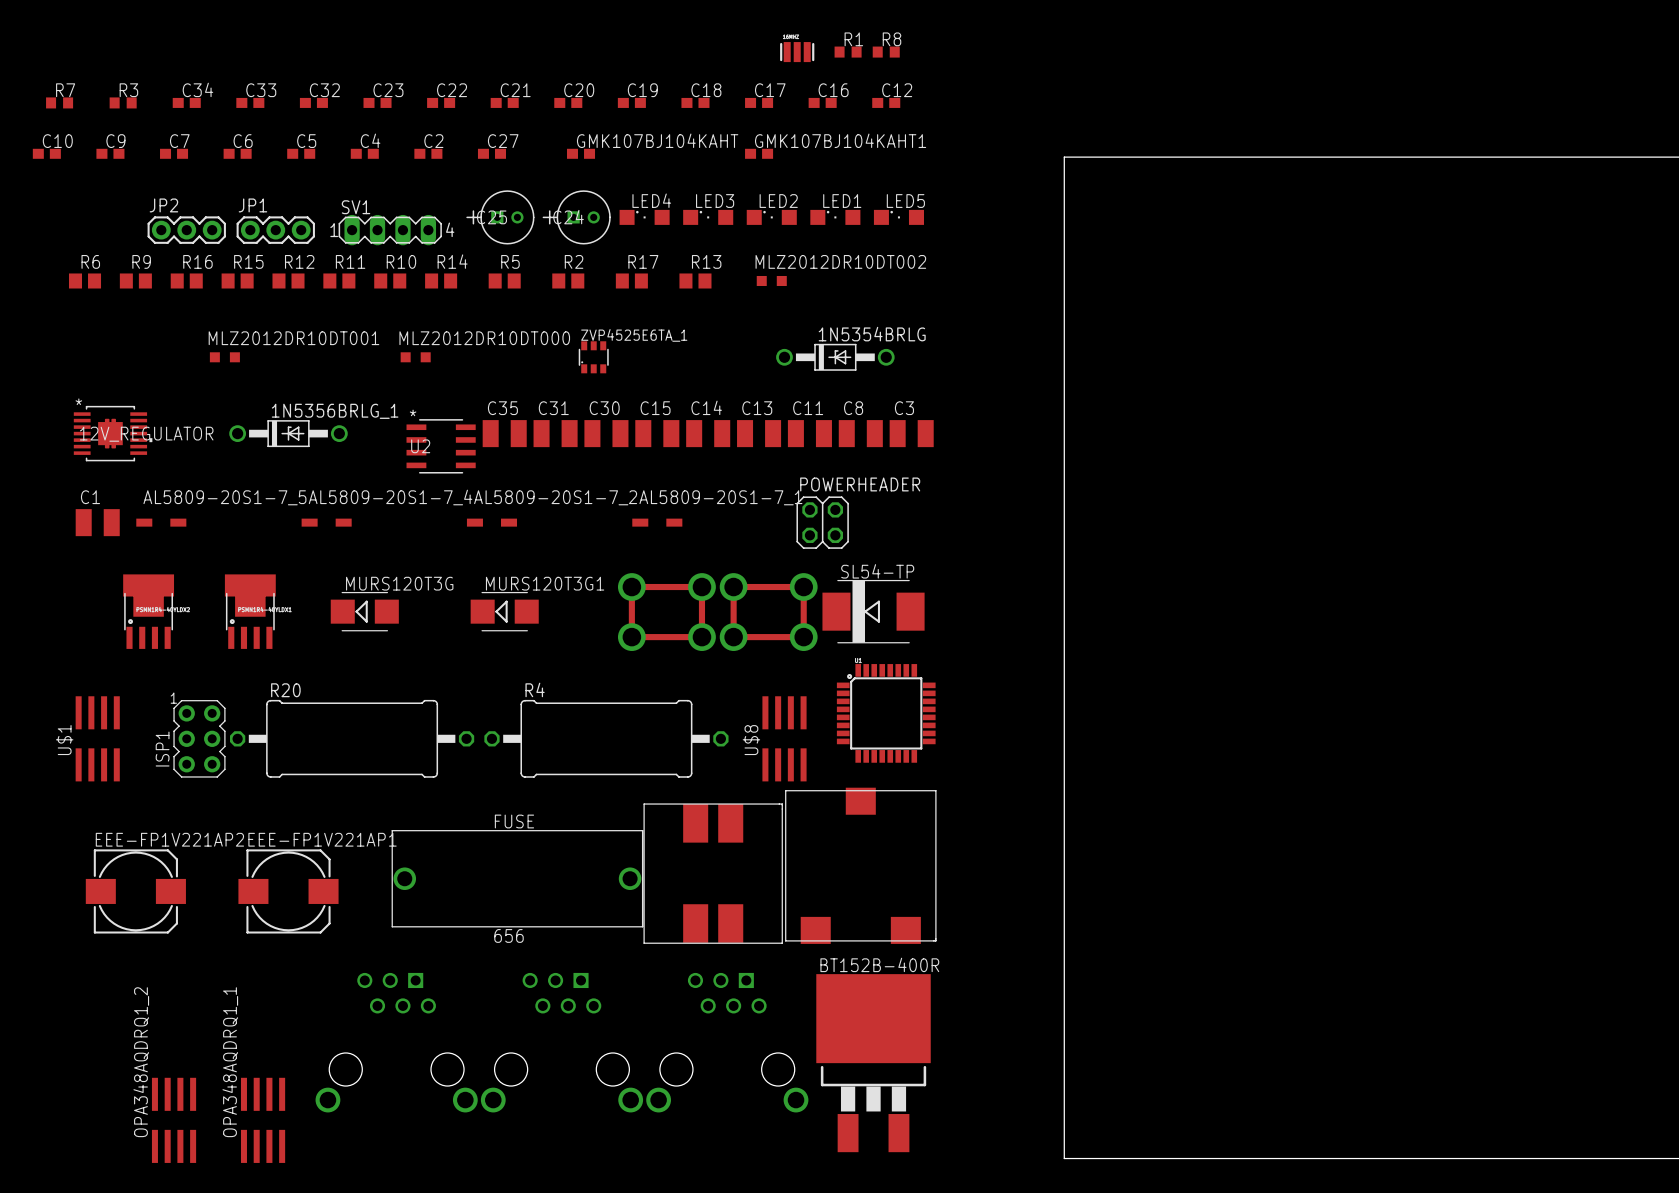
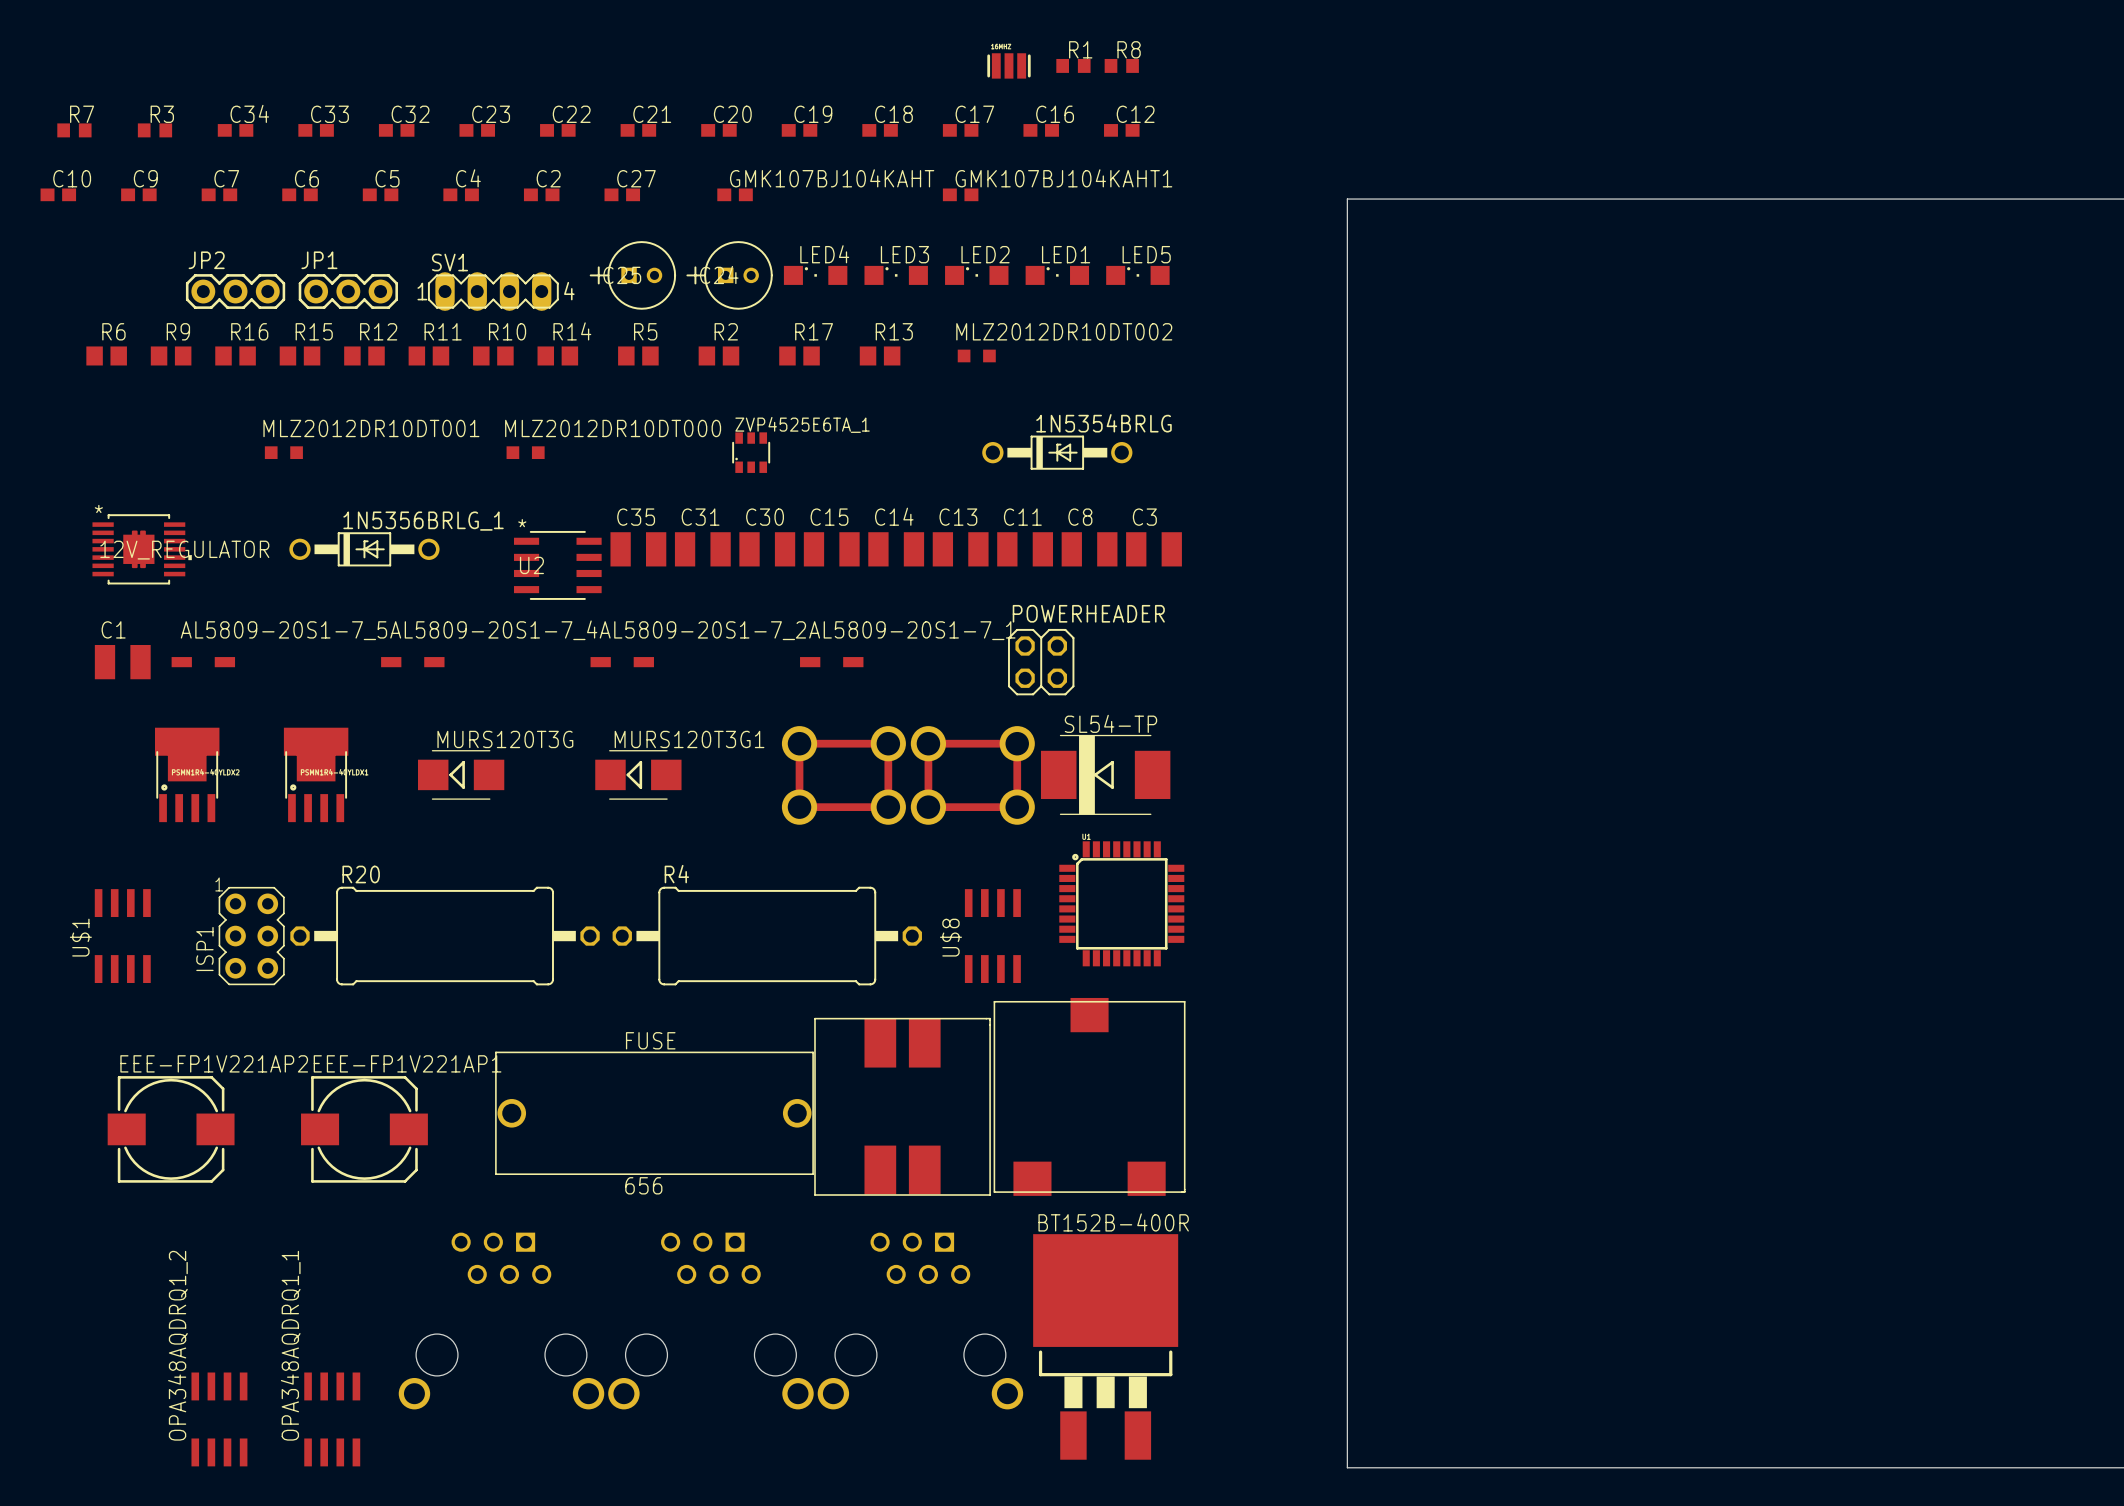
U$1 footprint: [75, 696, 120, 782] -> [94, 889, 151, 983]
U$8 footprint: [762, 696, 807, 782] -> [964, 889, 1021, 983]
OPA348AQDRQ1_2 footprint: [151, 1077, 197, 1163] -> [191, 1372, 248, 1467]
OPA348AQDRQ1_1 footprint: [240, 1077, 286, 1163] -> [304, 1372, 361, 1467]

